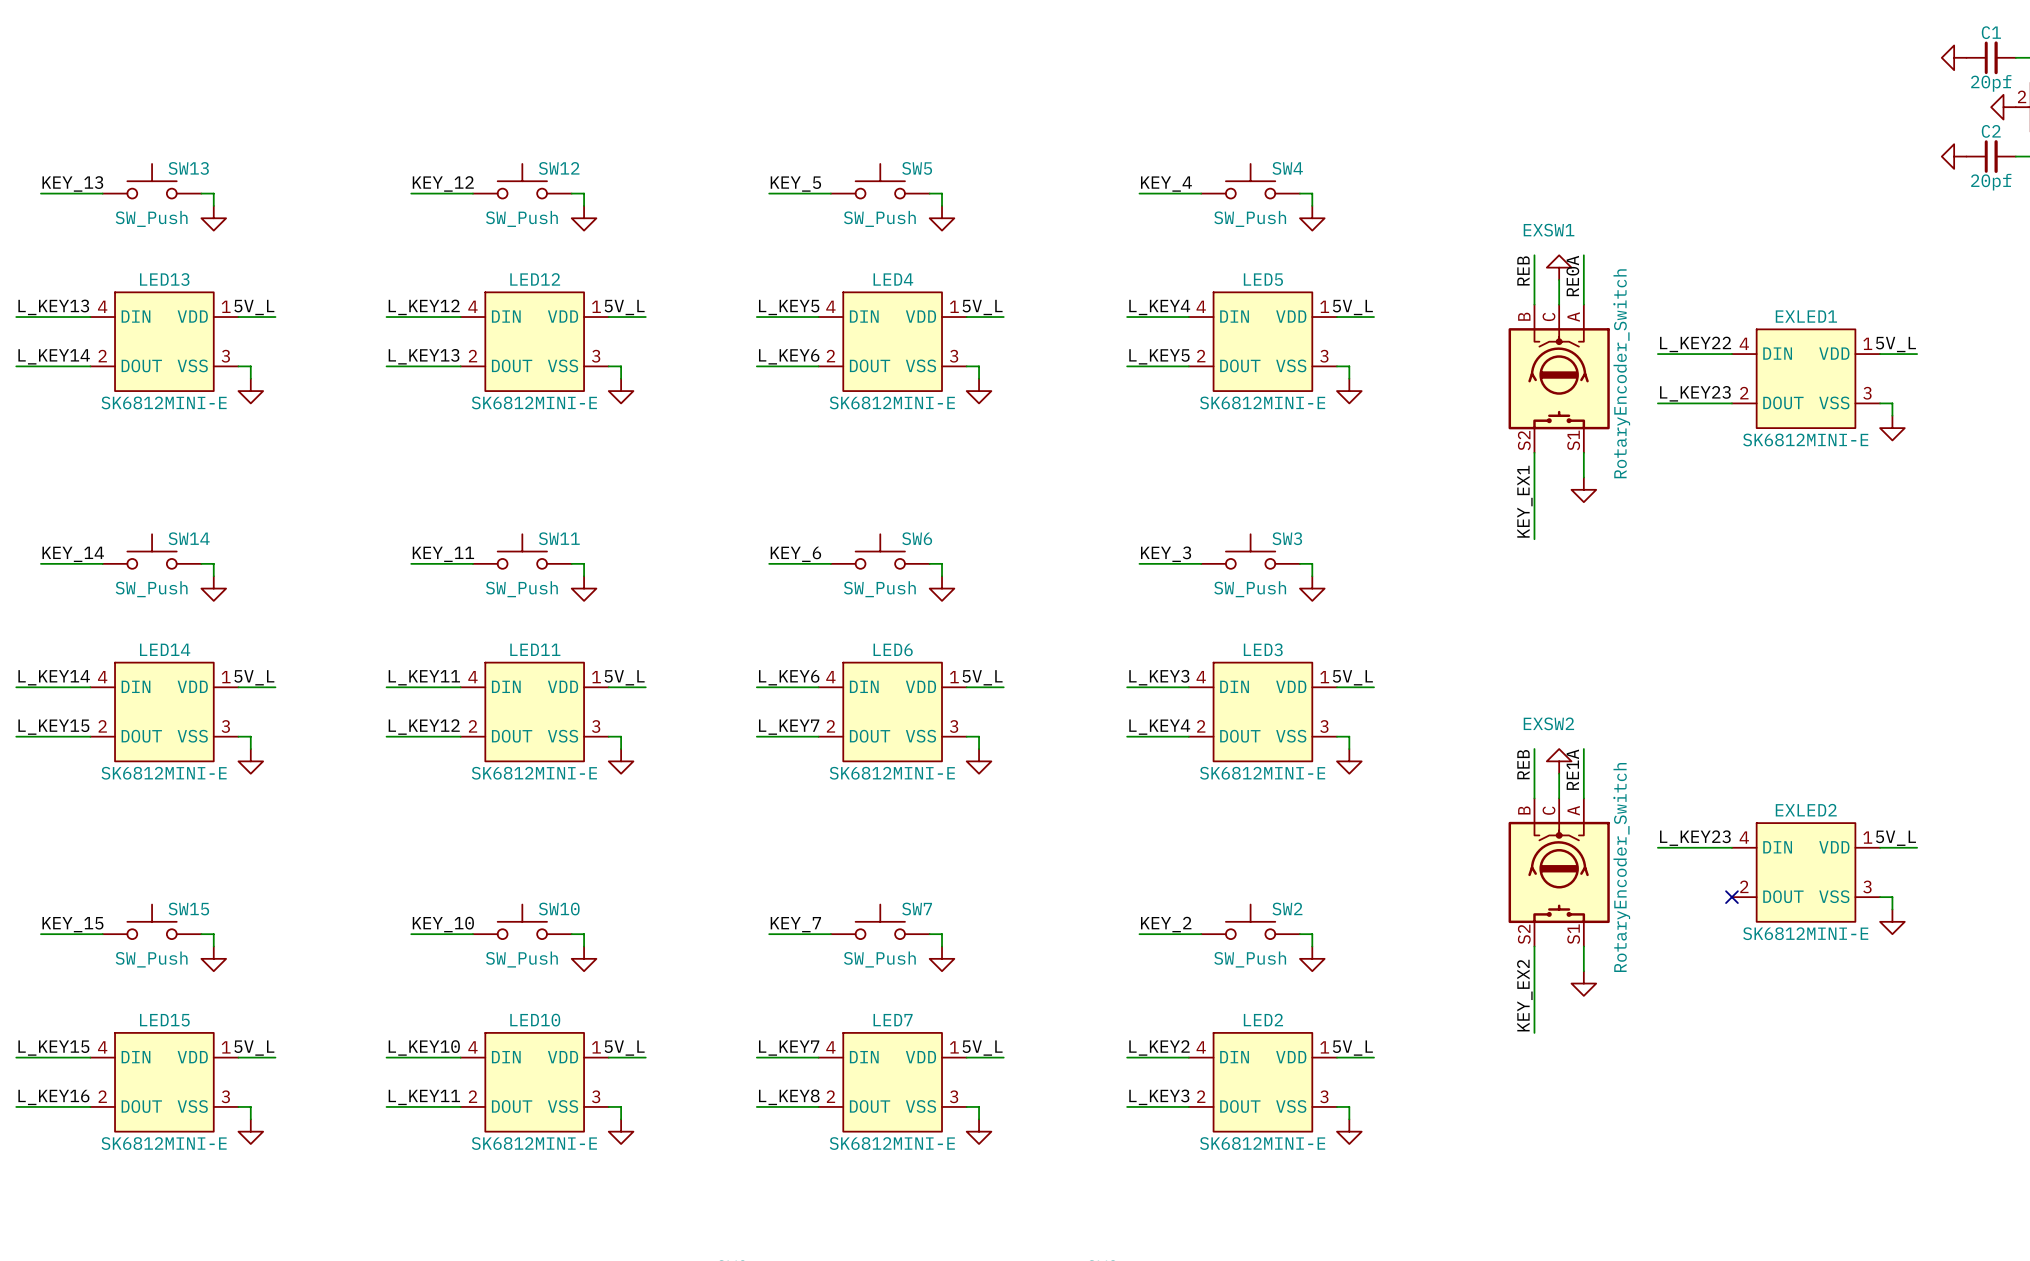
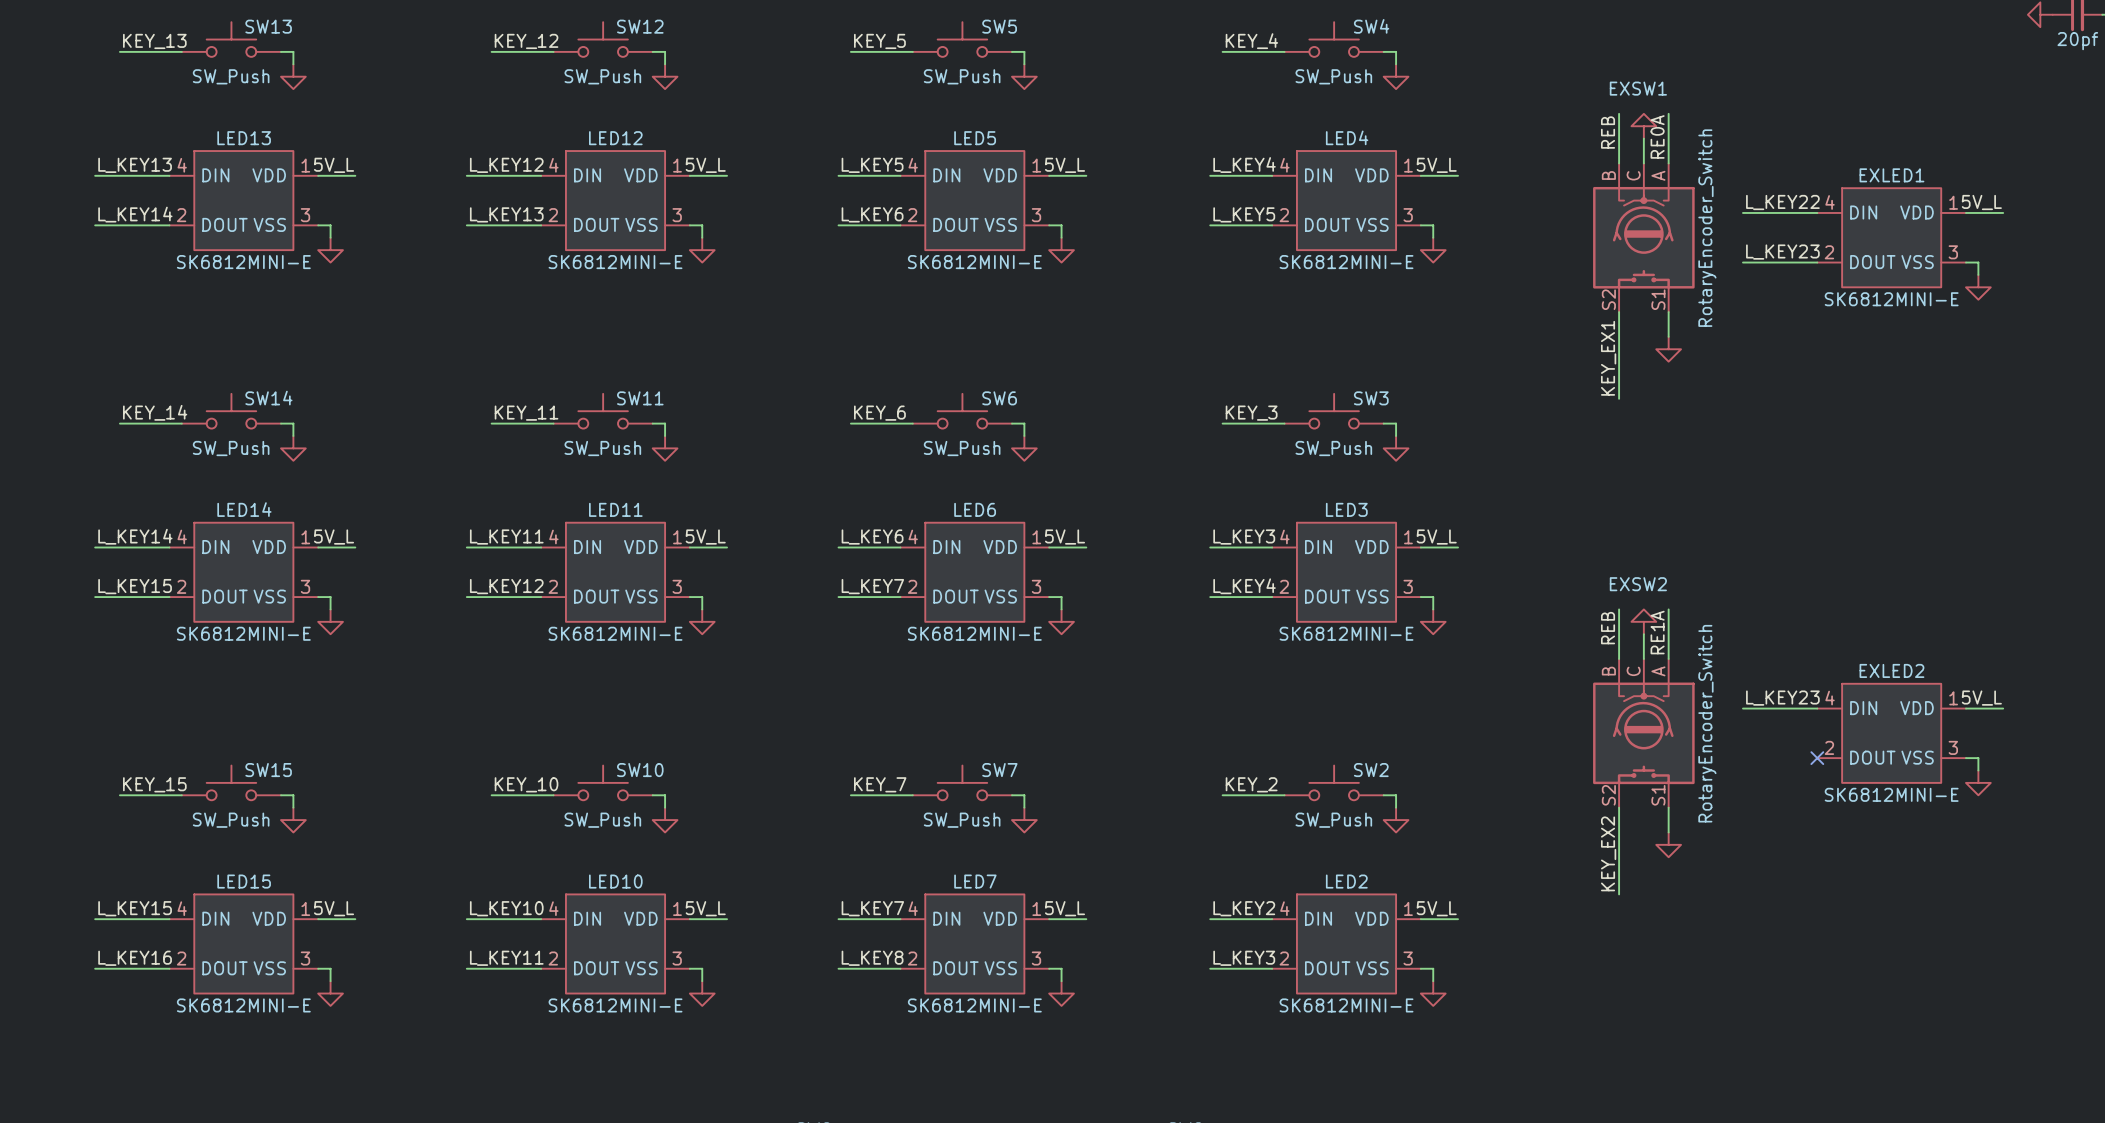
LED4 name: LED4 (893, 279) -> LED5 (975, 138)
LED5 name: LED5 (1263, 279) -> LED4 (1347, 137)

